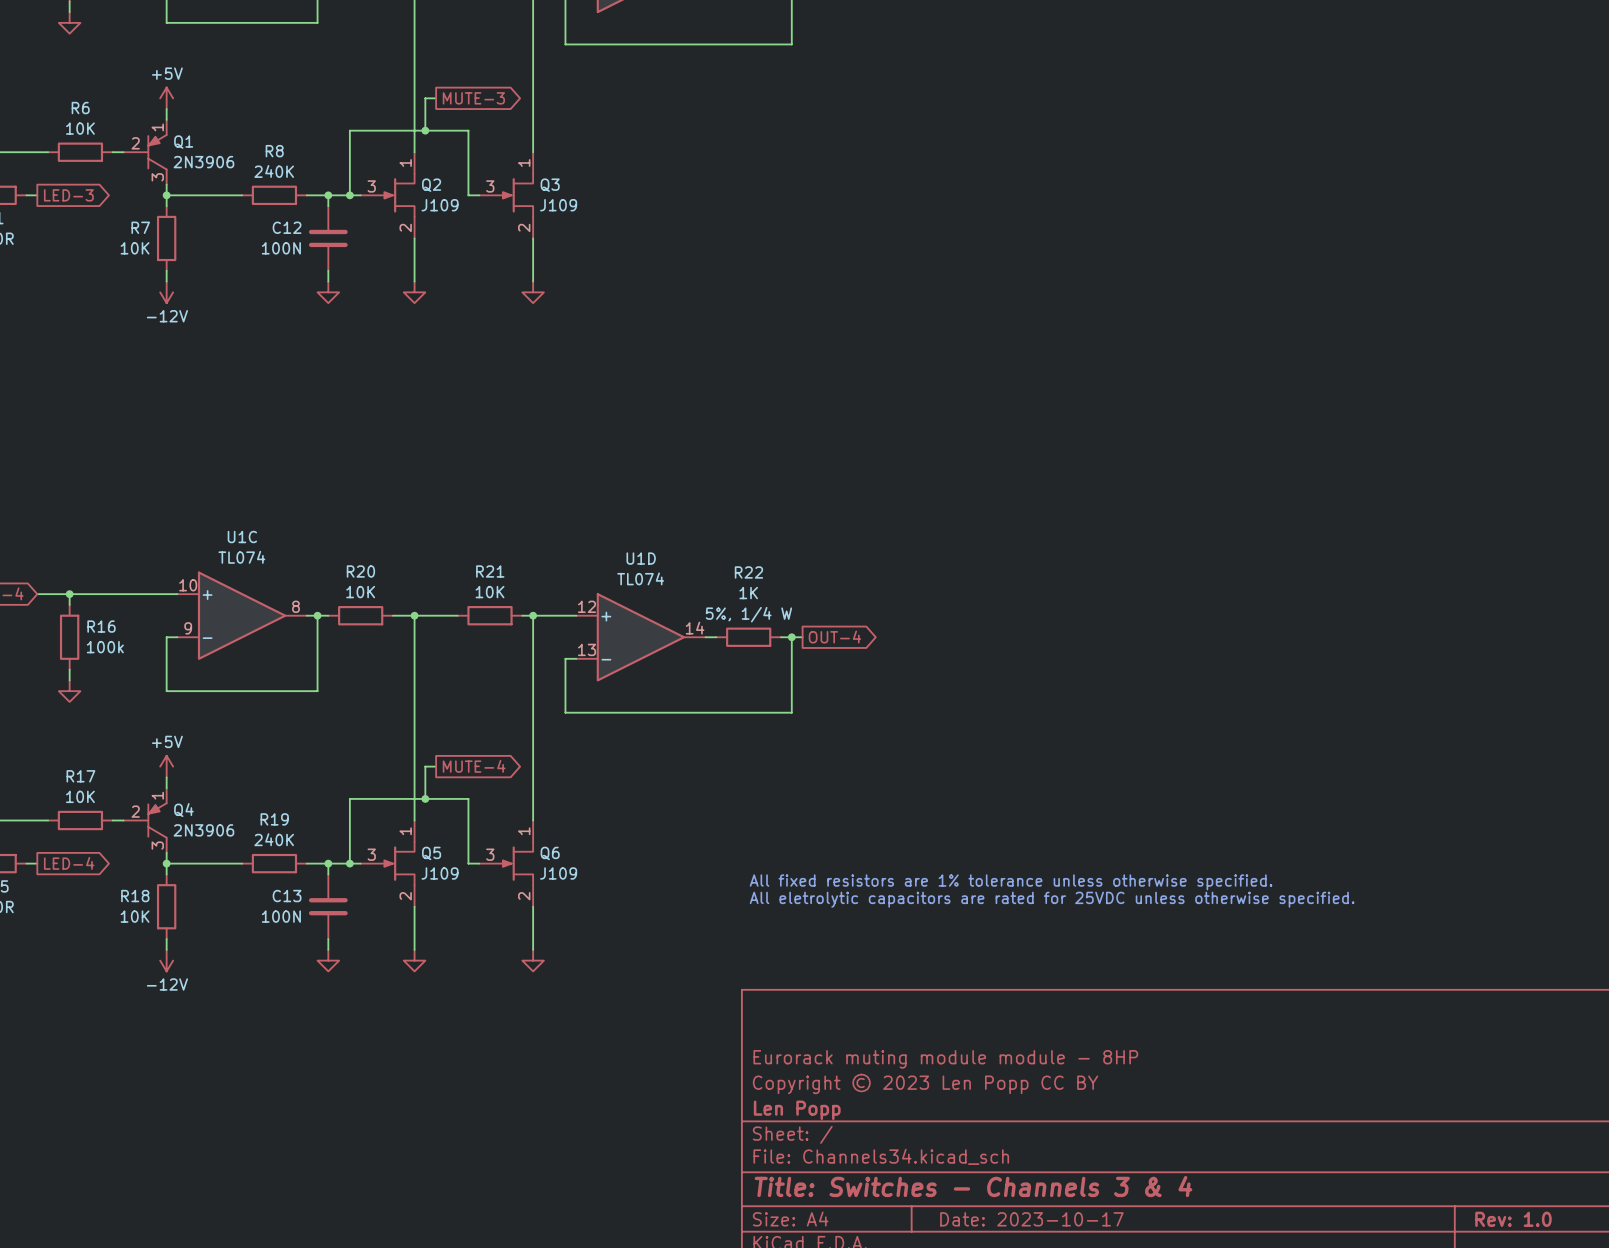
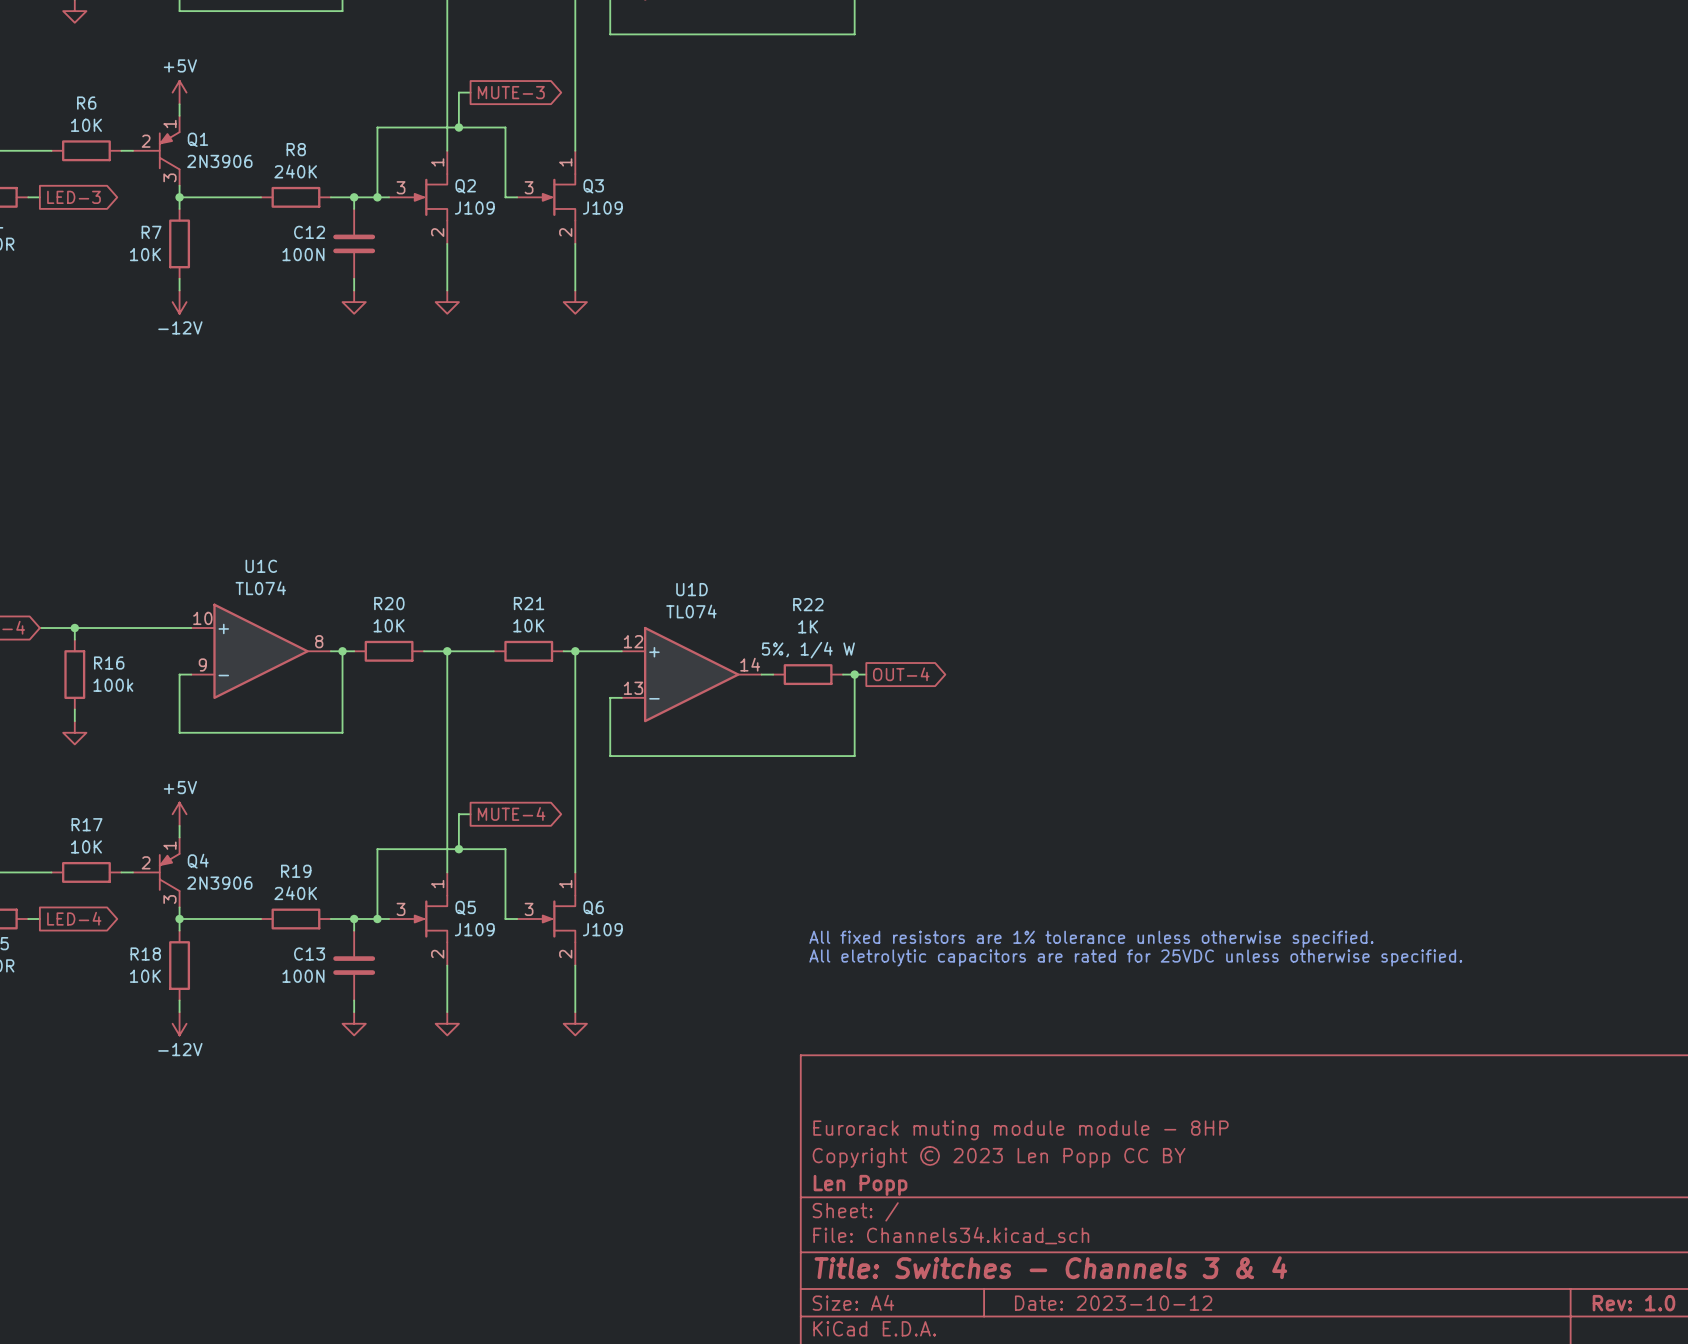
title block: Date: 2023-10-17 (1031, 1219) -> Date: 2023-10-12 (1113, 1303)

